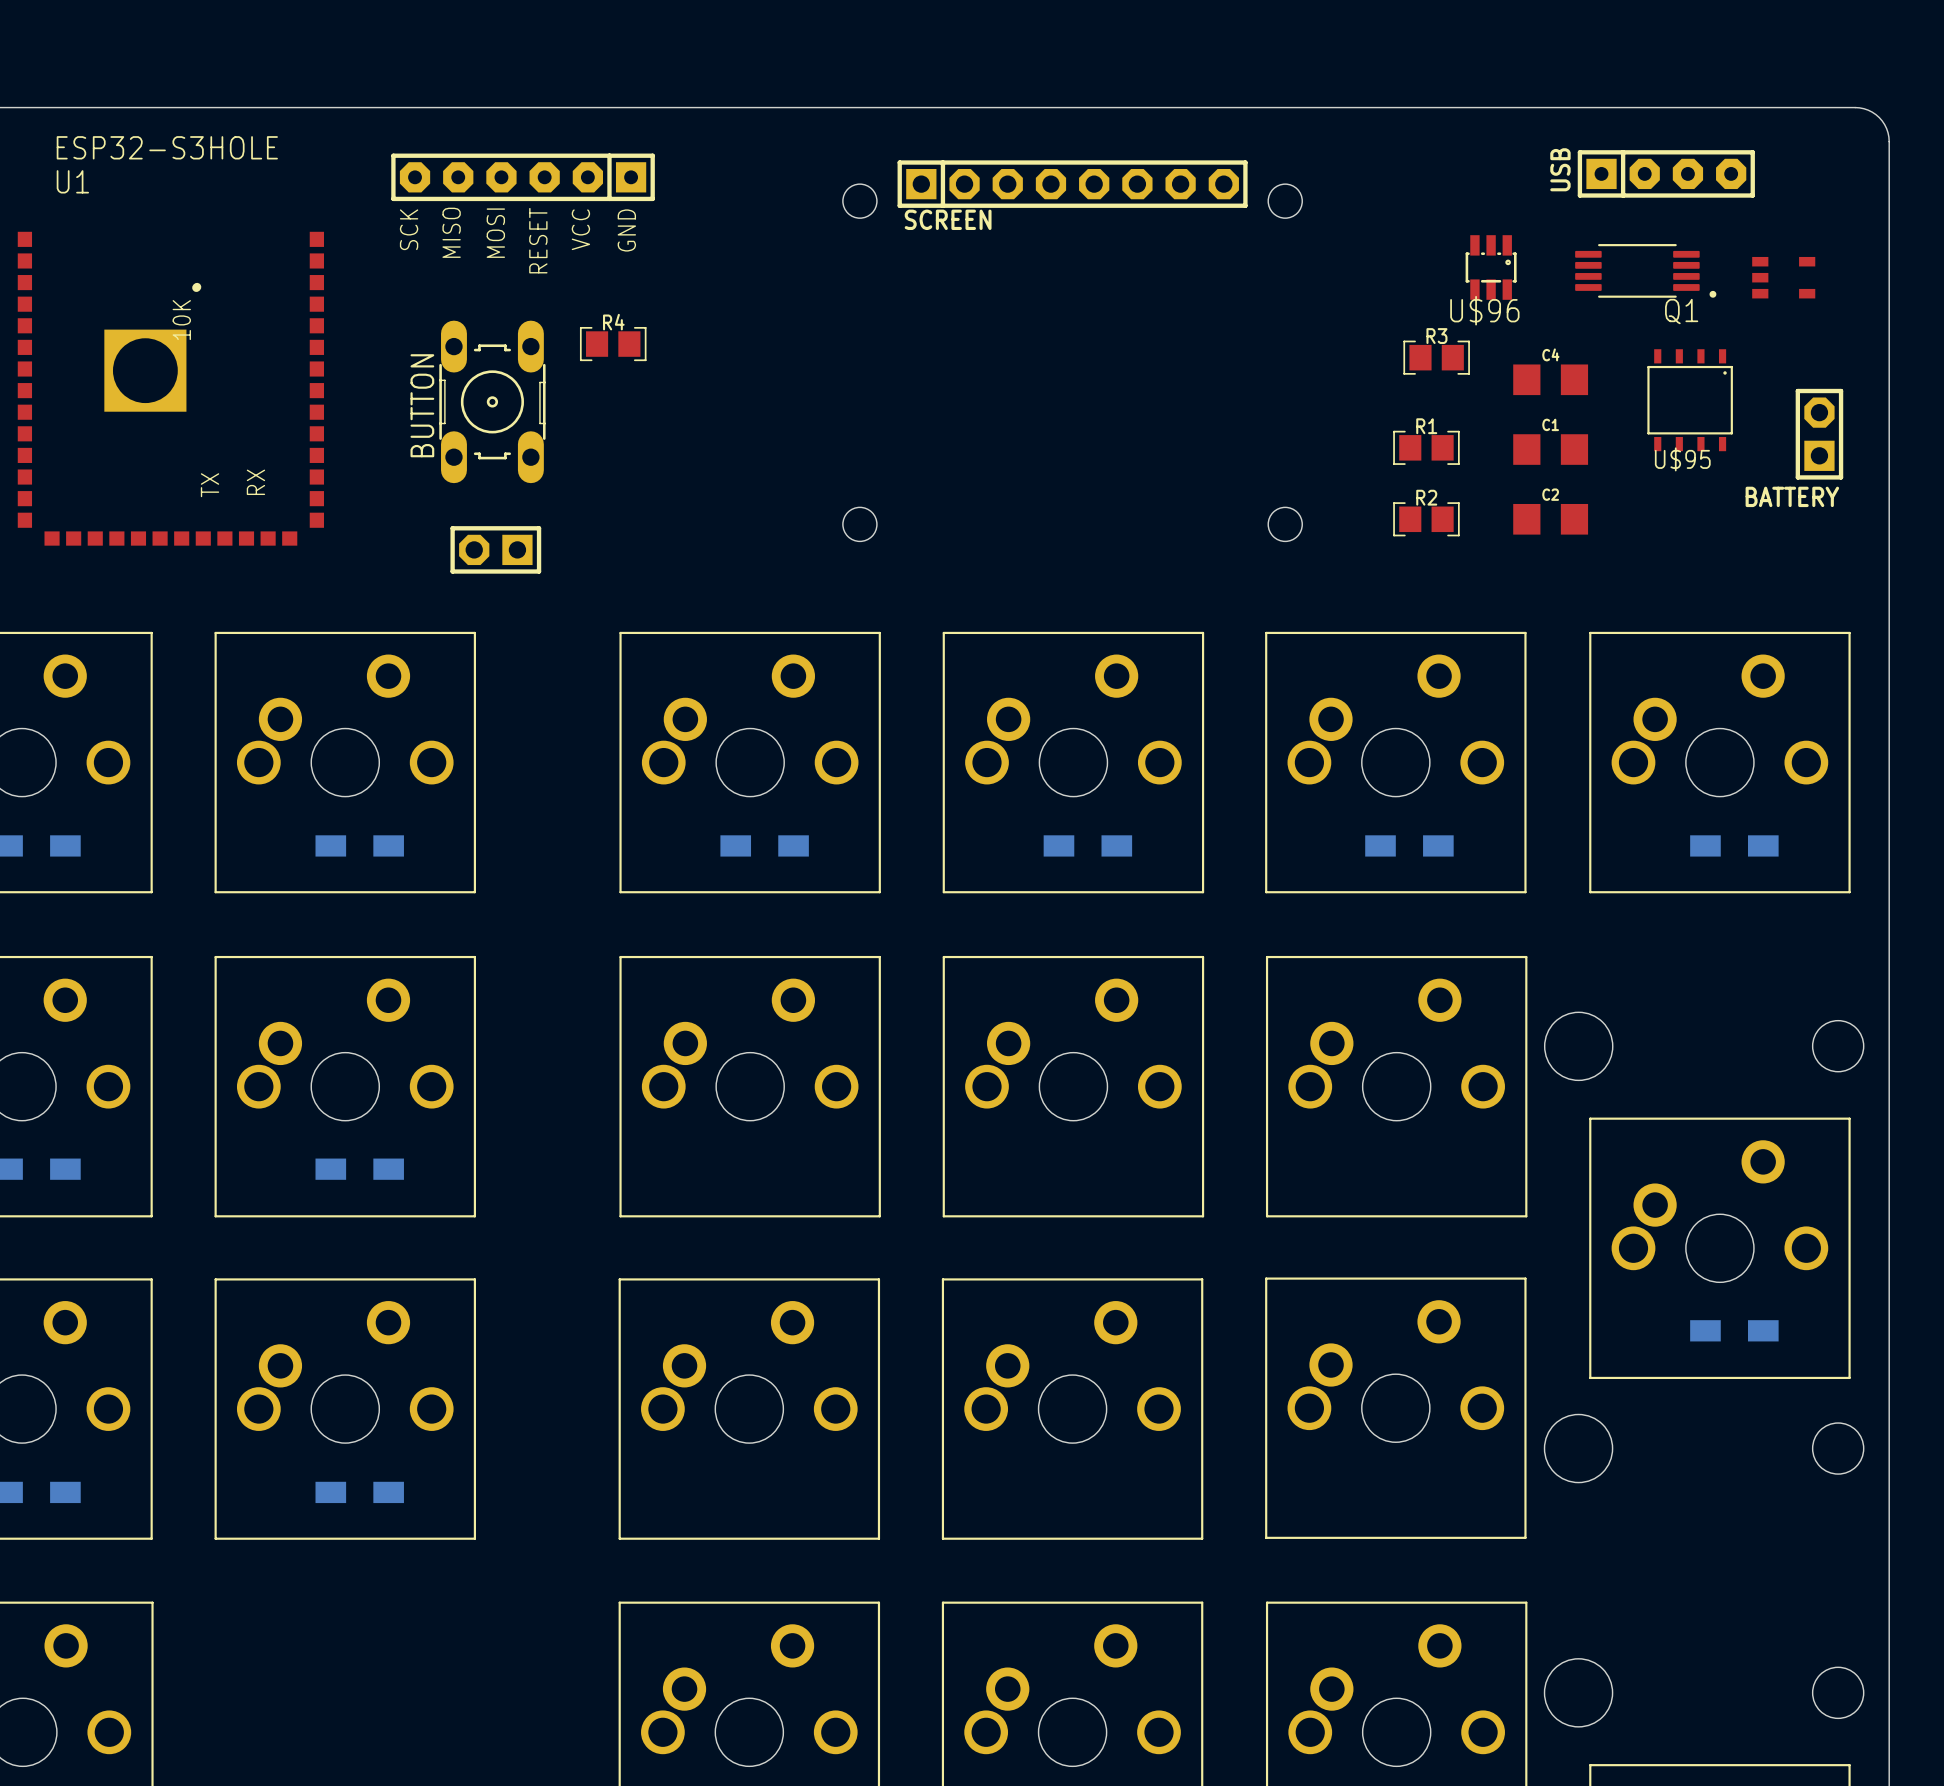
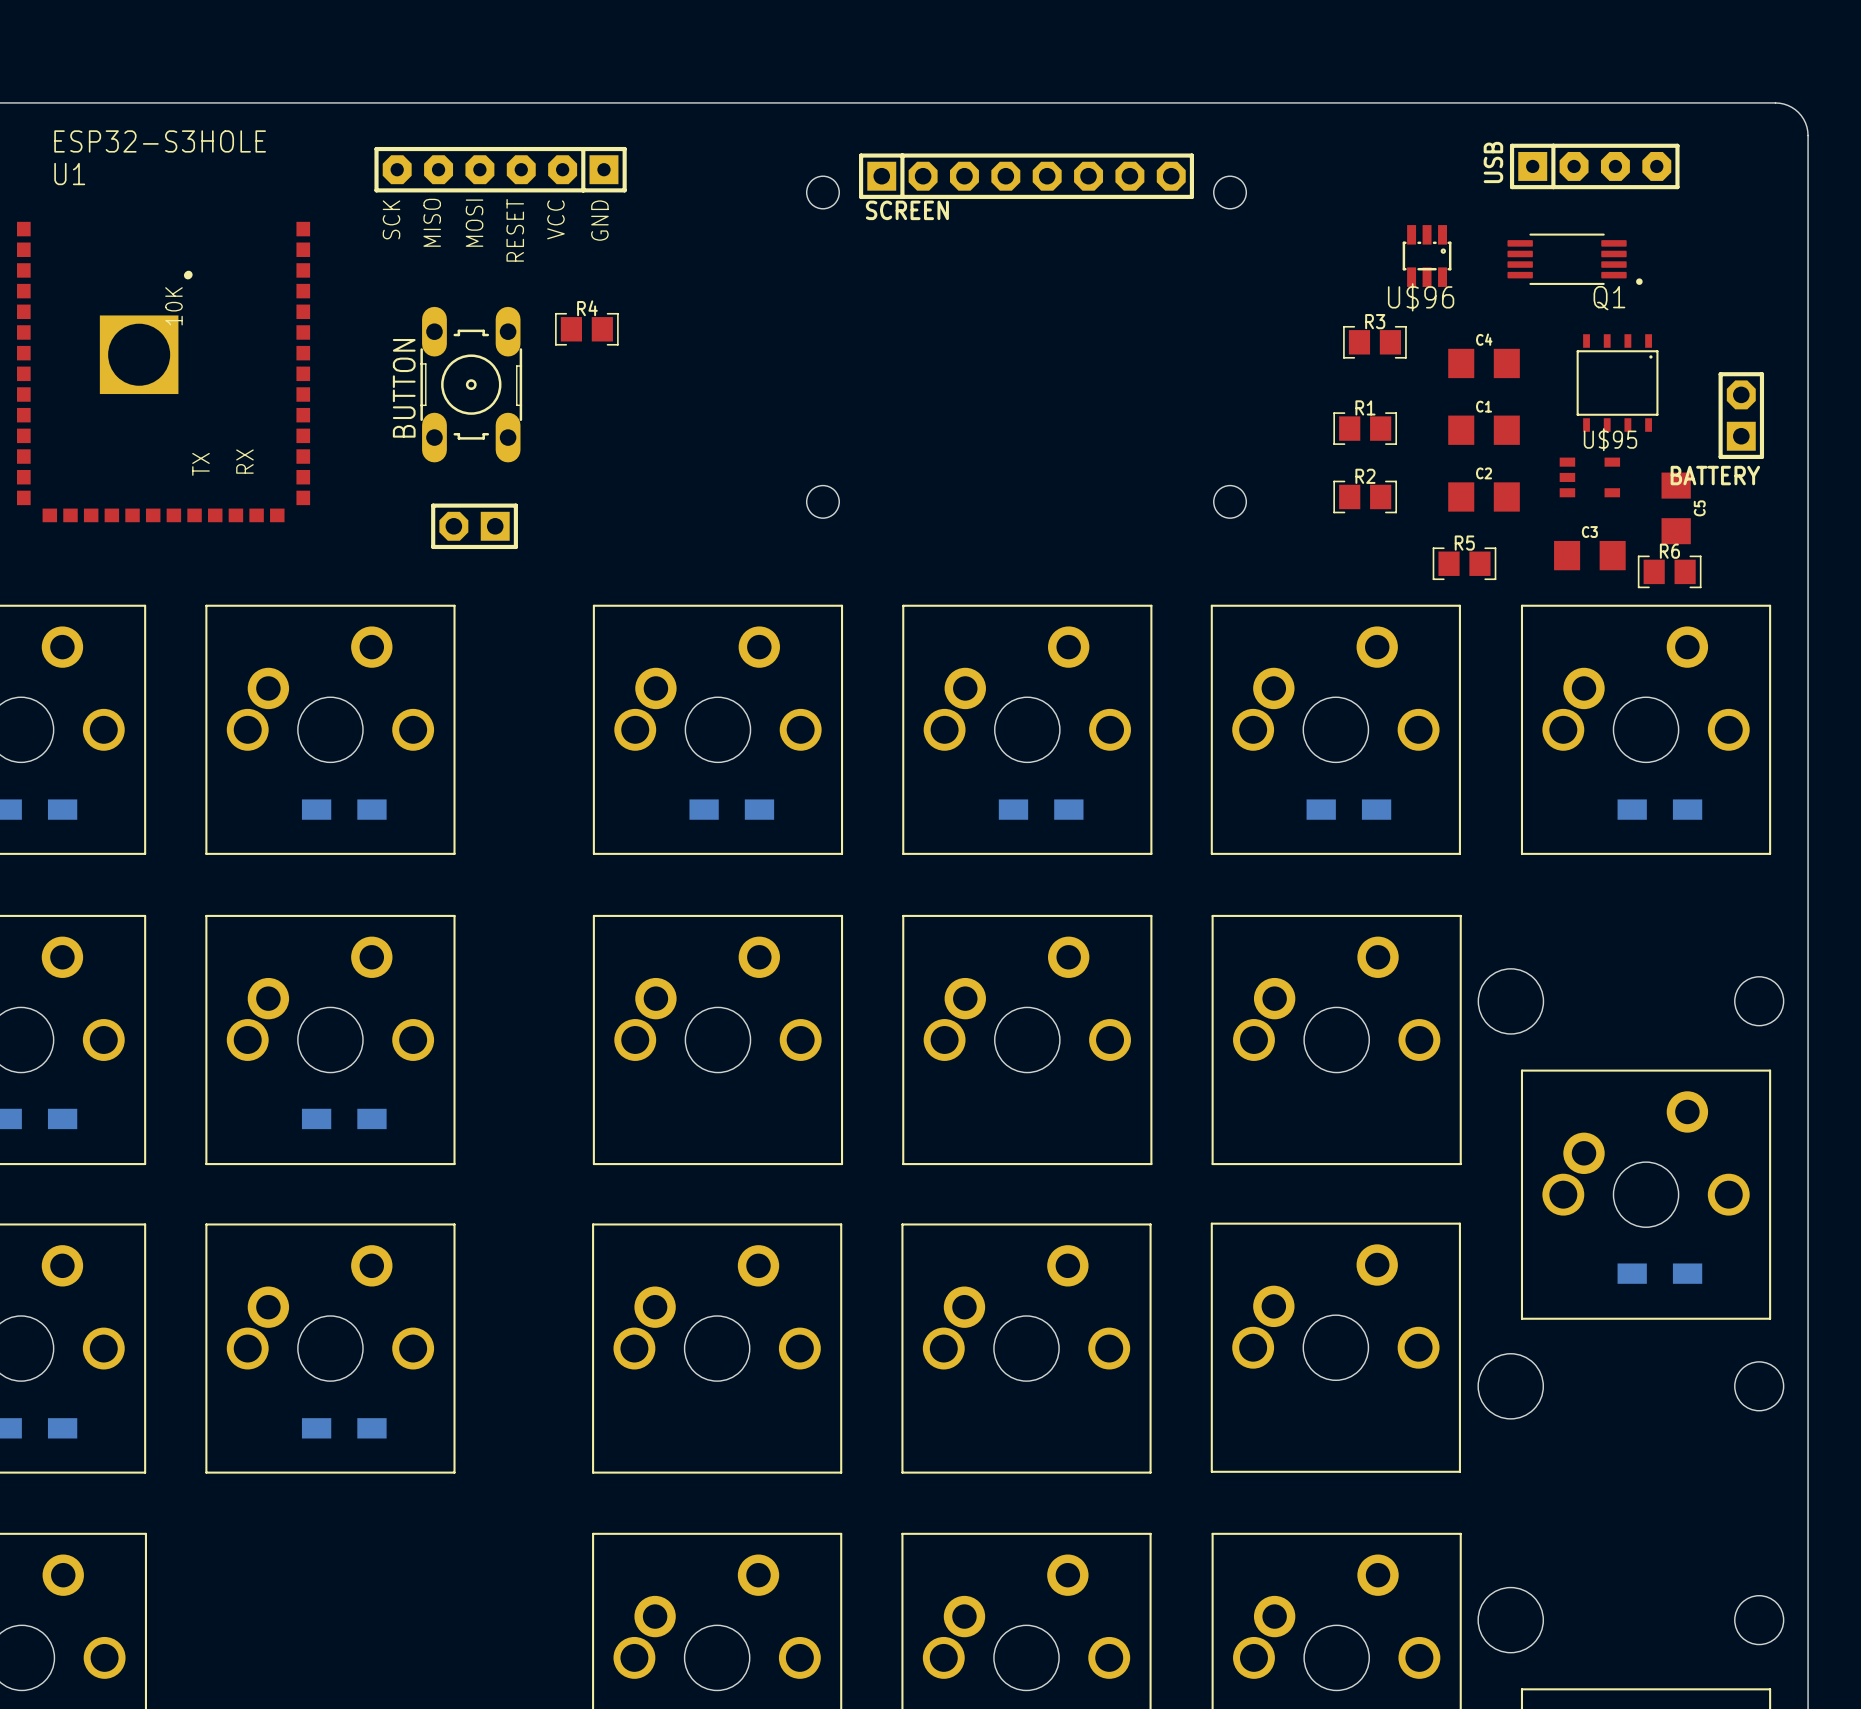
part position: (1783, 277) -> (1589, 477)
C5: none -> (1676, 508)
C3: none -> (1589, 555)
R5: none -> (1464, 563)
R6: none -> (1669, 571)

